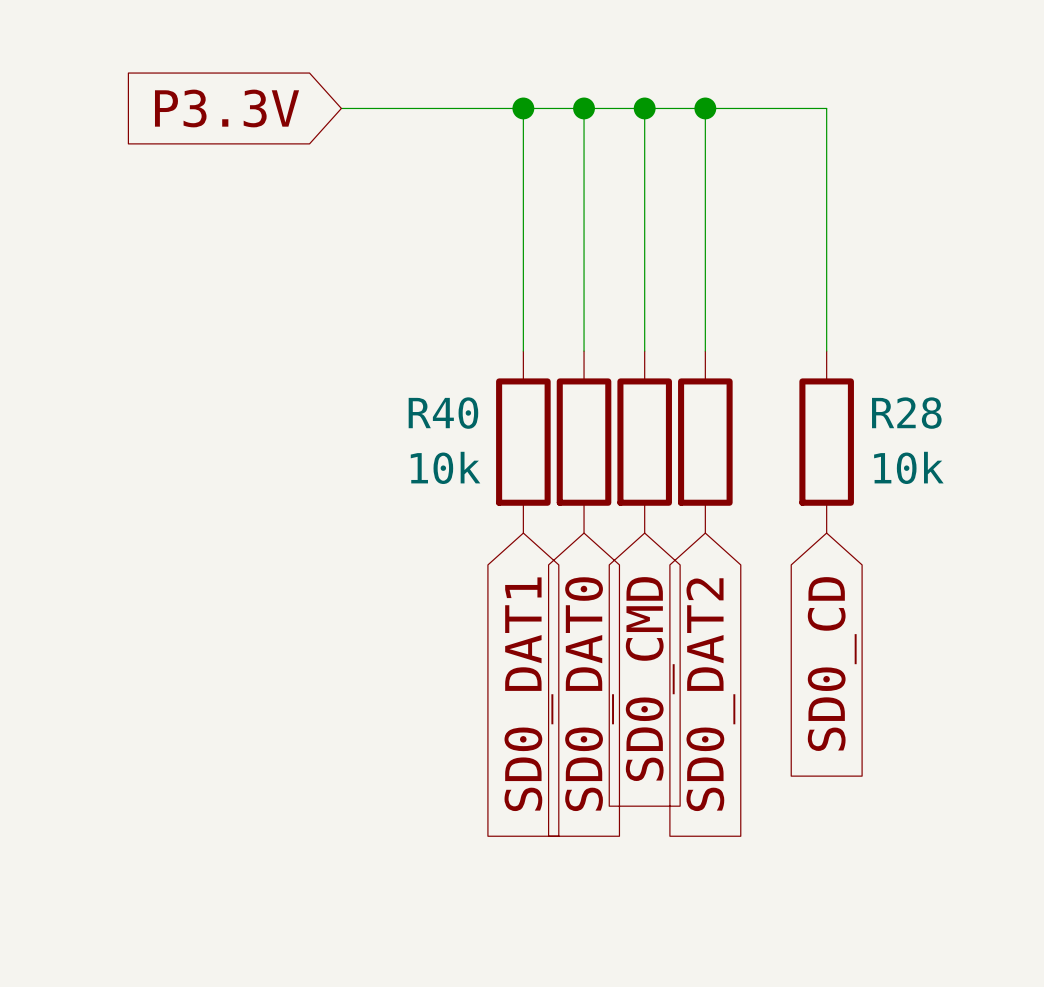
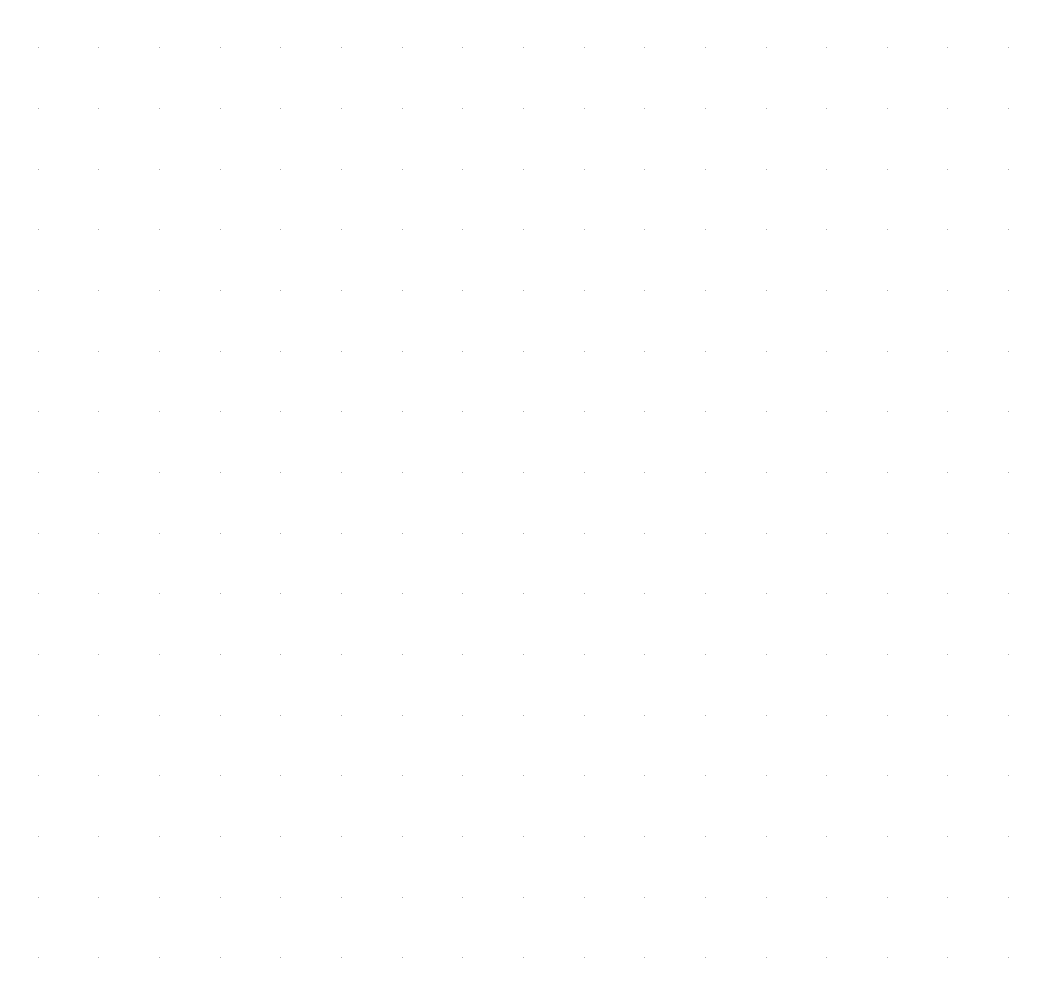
global label: P3.3V (227, 108) -> none
wire: (341, 108) (826, 108) (826, 351) -> none
wire: (523, 108) (523, 351) -> none
junction: (523, 108) -> none
wire: (584, 108) (584, 351) -> none
junction: (584, 108) -> none
wire: (644, 108) (644, 351) -> none
junction: (644, 108) -> none
wire: (705, 108) (705, 351) -> none
junction: (705, 108) -> none
R40: 10k (523, 442) -> none
part: (584, 442) -> none
part: (644, 442) -> none
part: (705, 442) -> none
R28: 10k (826, 442) -> none
global label: SD0_CD (832, 664) -> none
global label: SD0_CMD (650, 679) -> none
global label: SD0_DAT1 (528, 694) -> none
global label: SD0_DAT0 (589, 694) -> none
global label: SD0_DAT2 (710, 694) -> none

